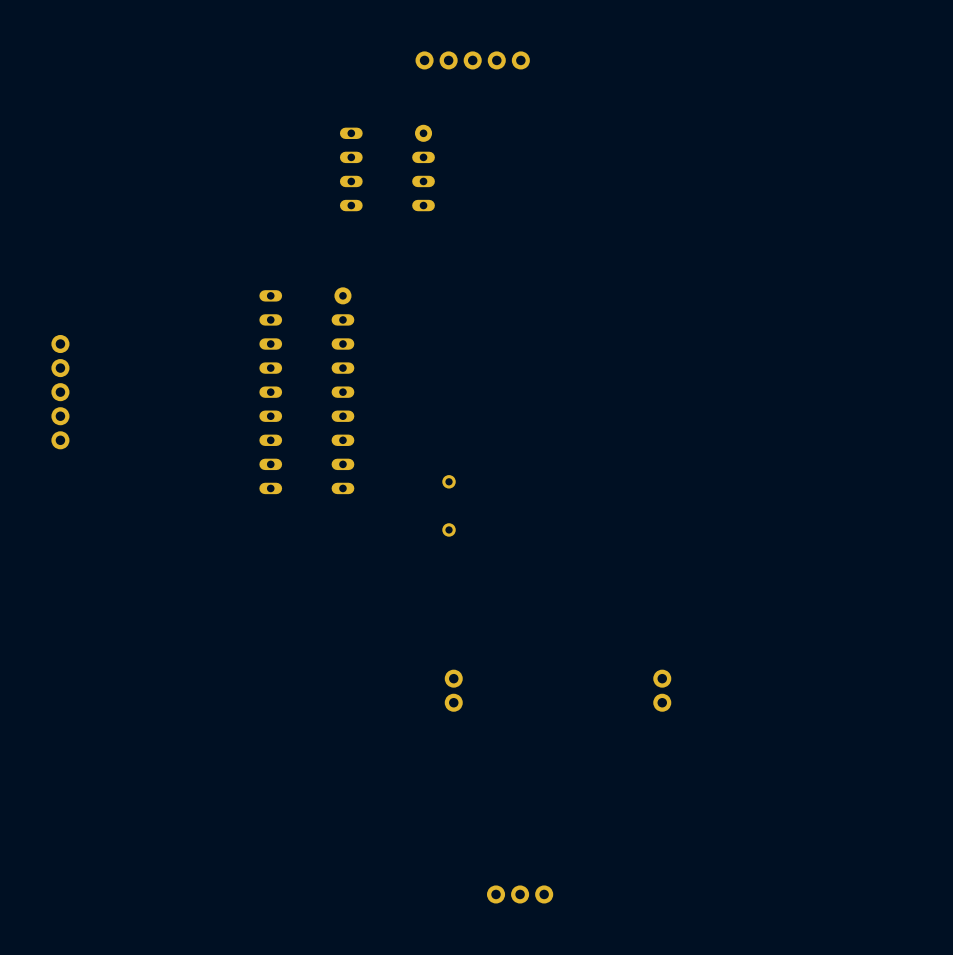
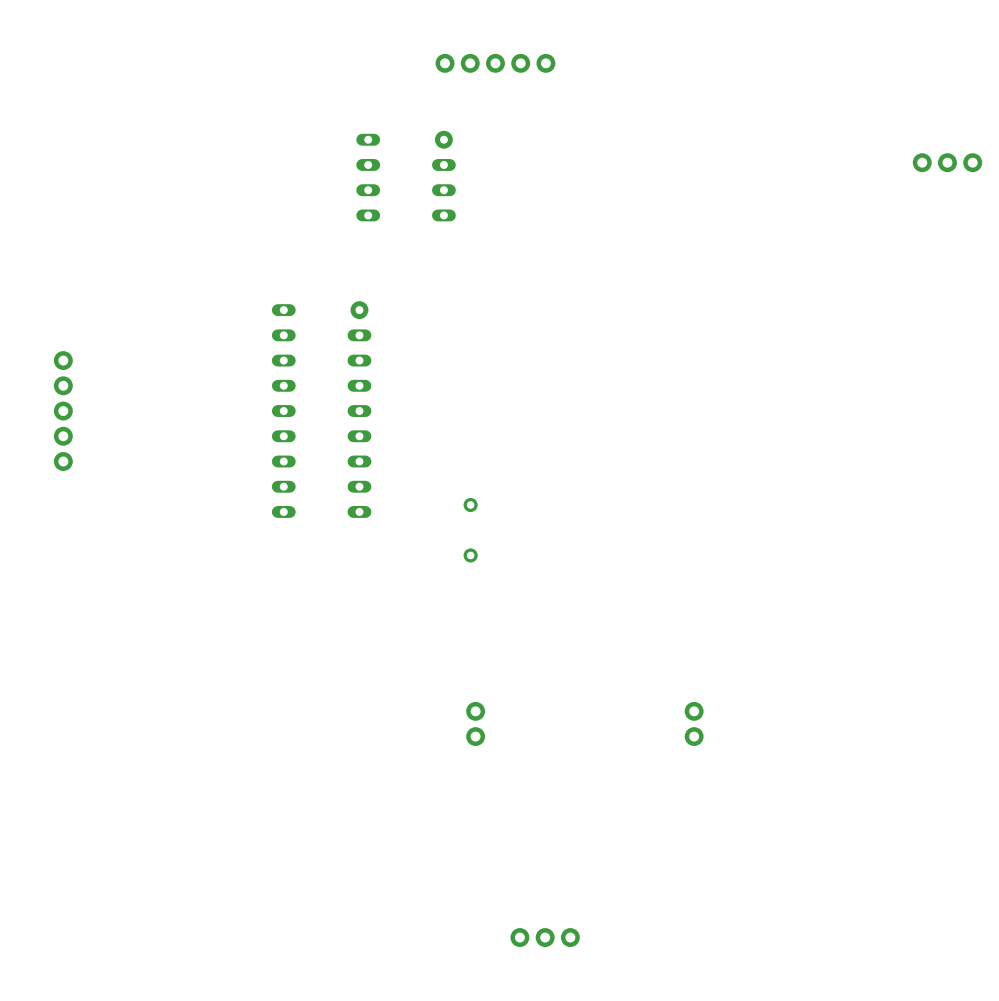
part: none -> (947, 162)

